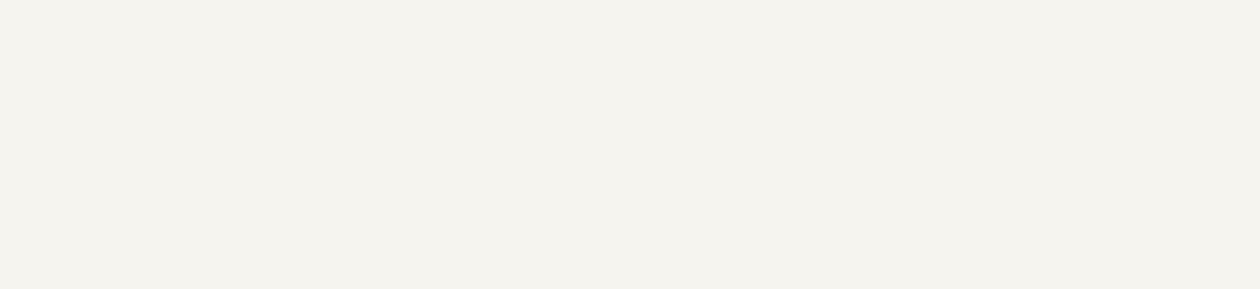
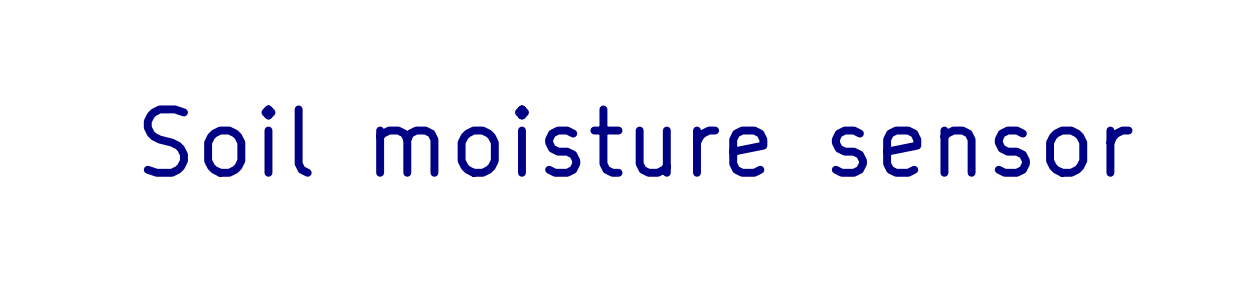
text: none -> Soil moisture sensor (638, 141)

